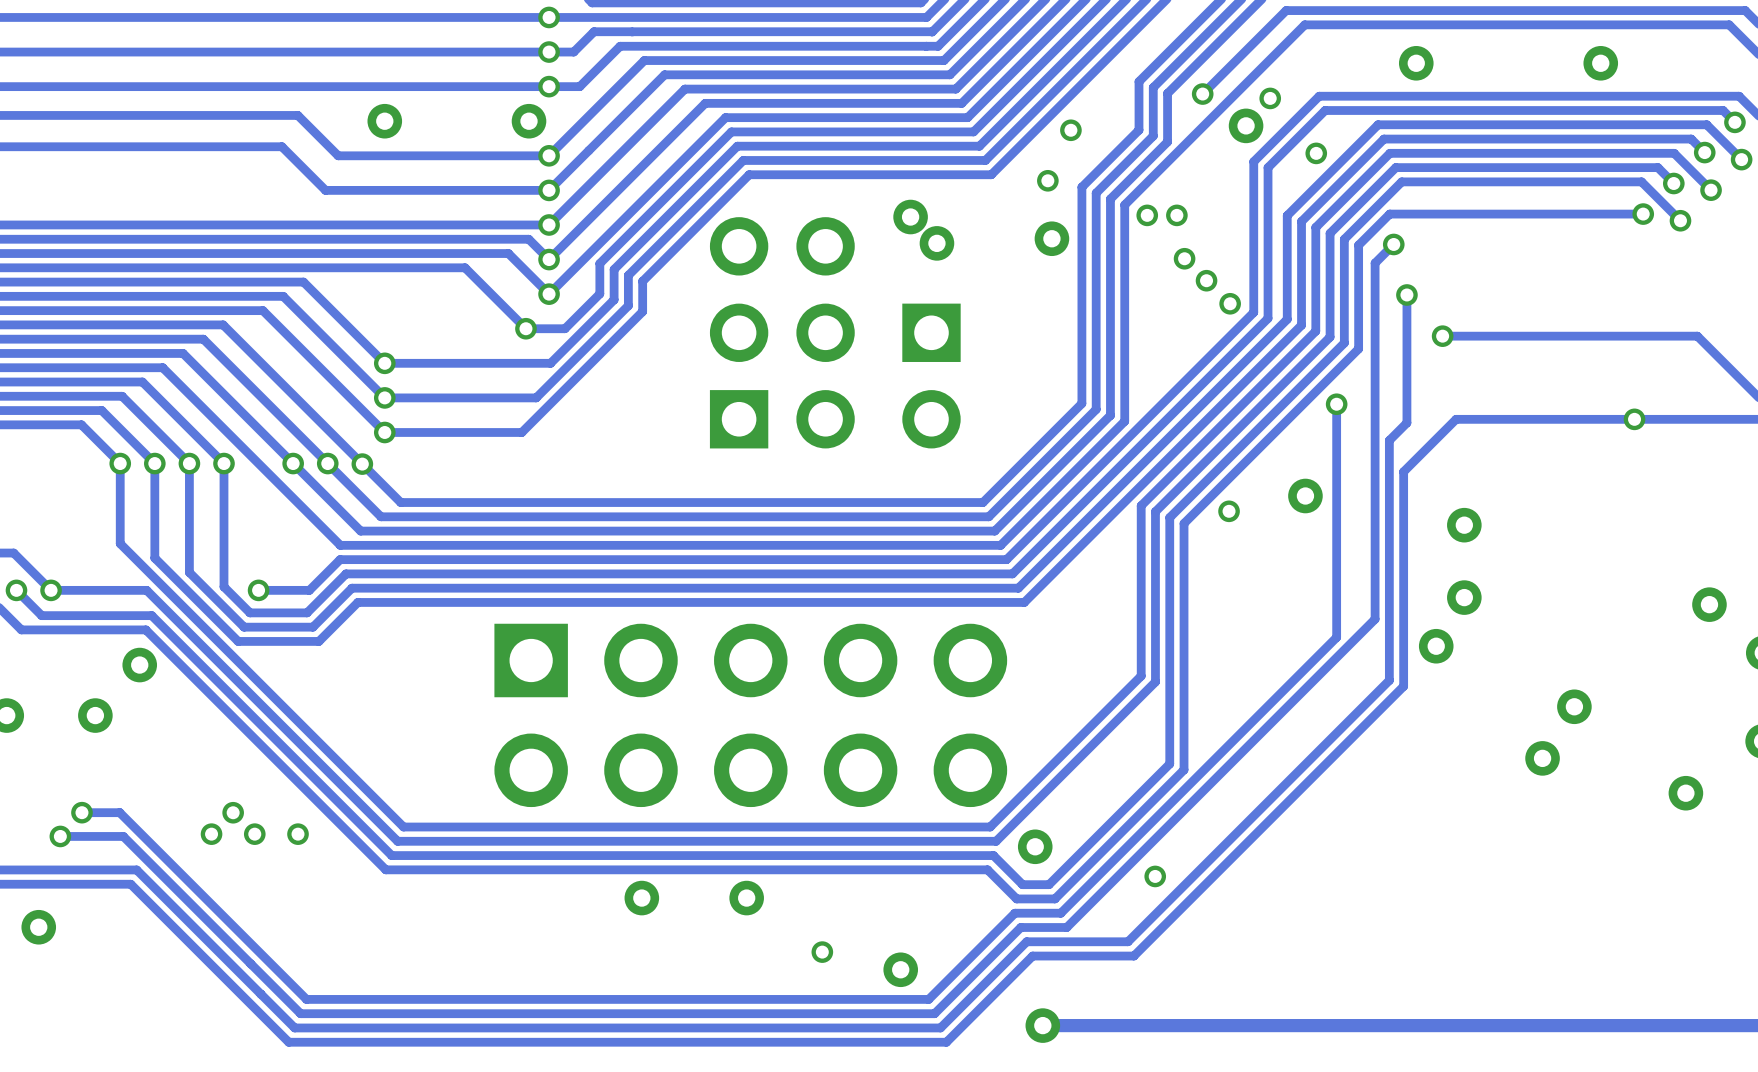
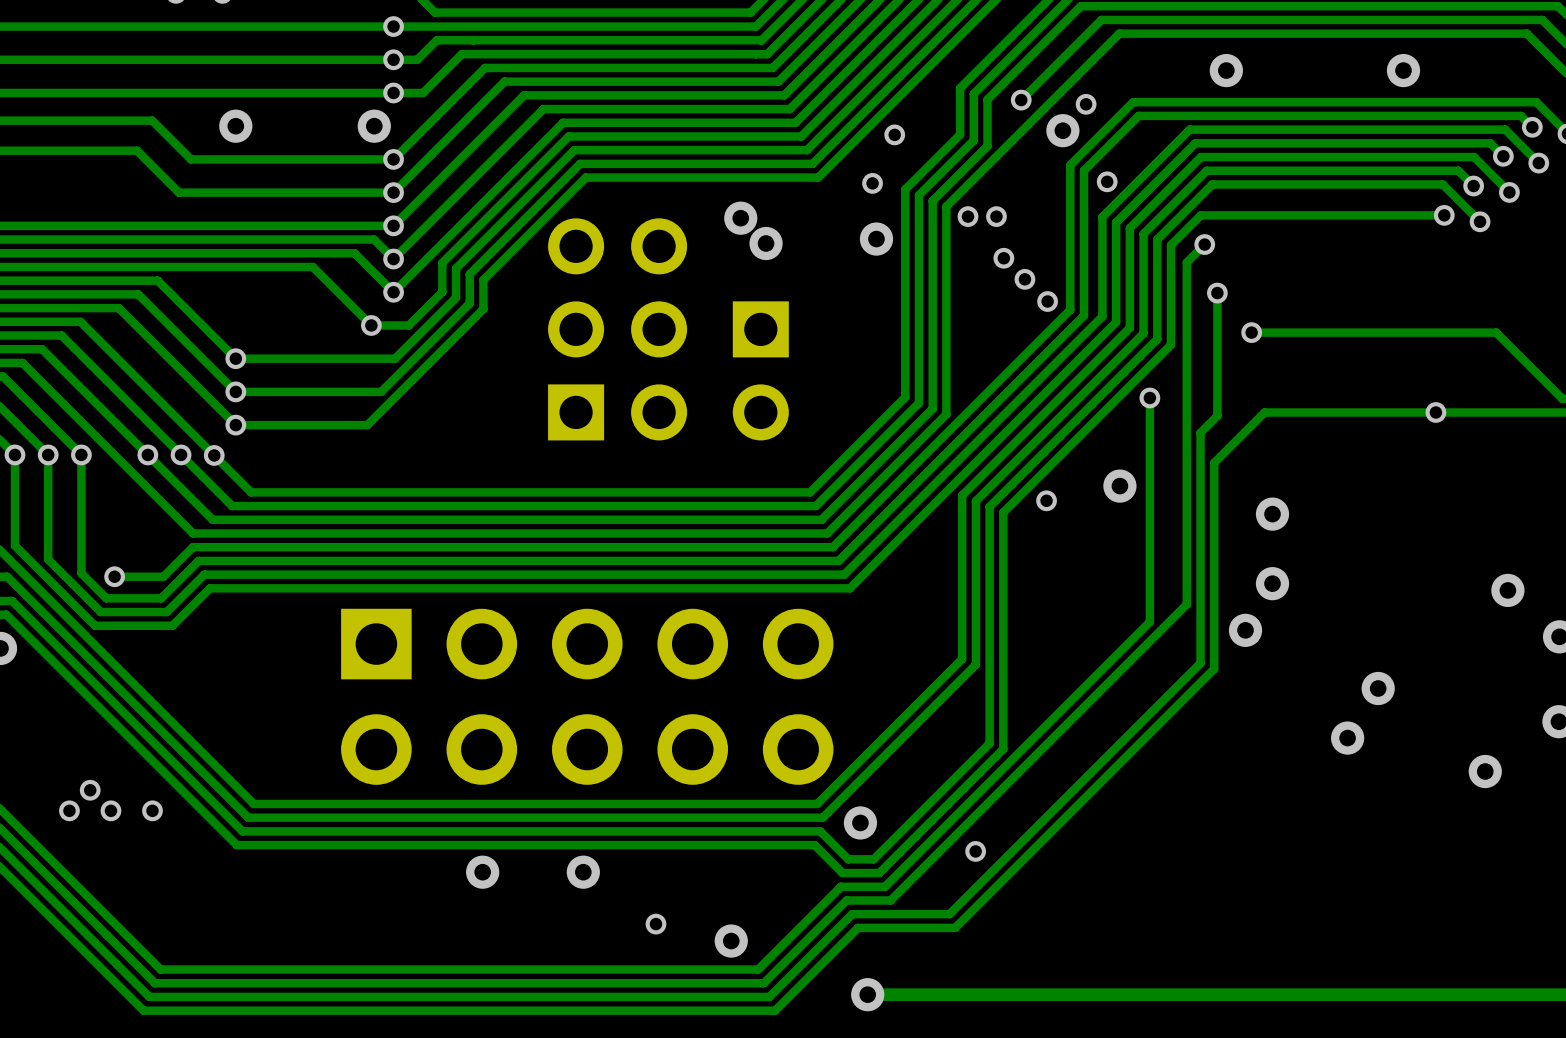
via position: (1316, 153) -> (1107, 181)

